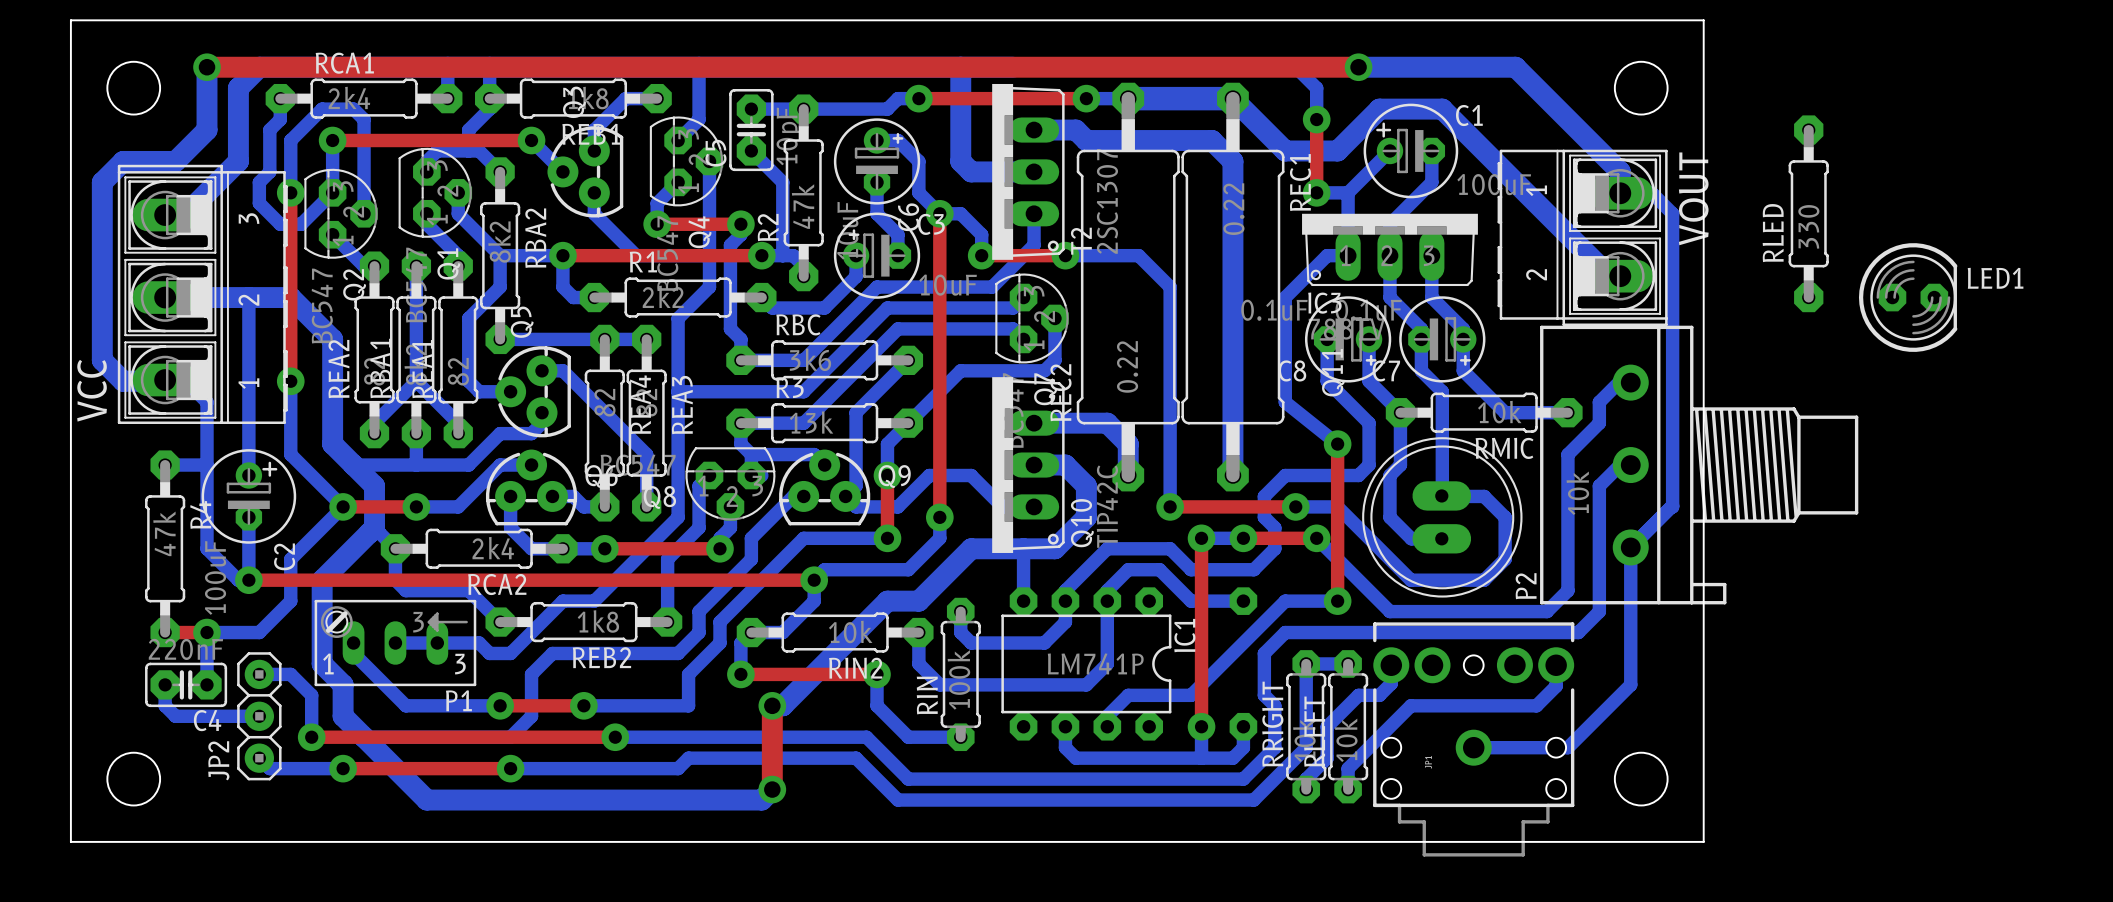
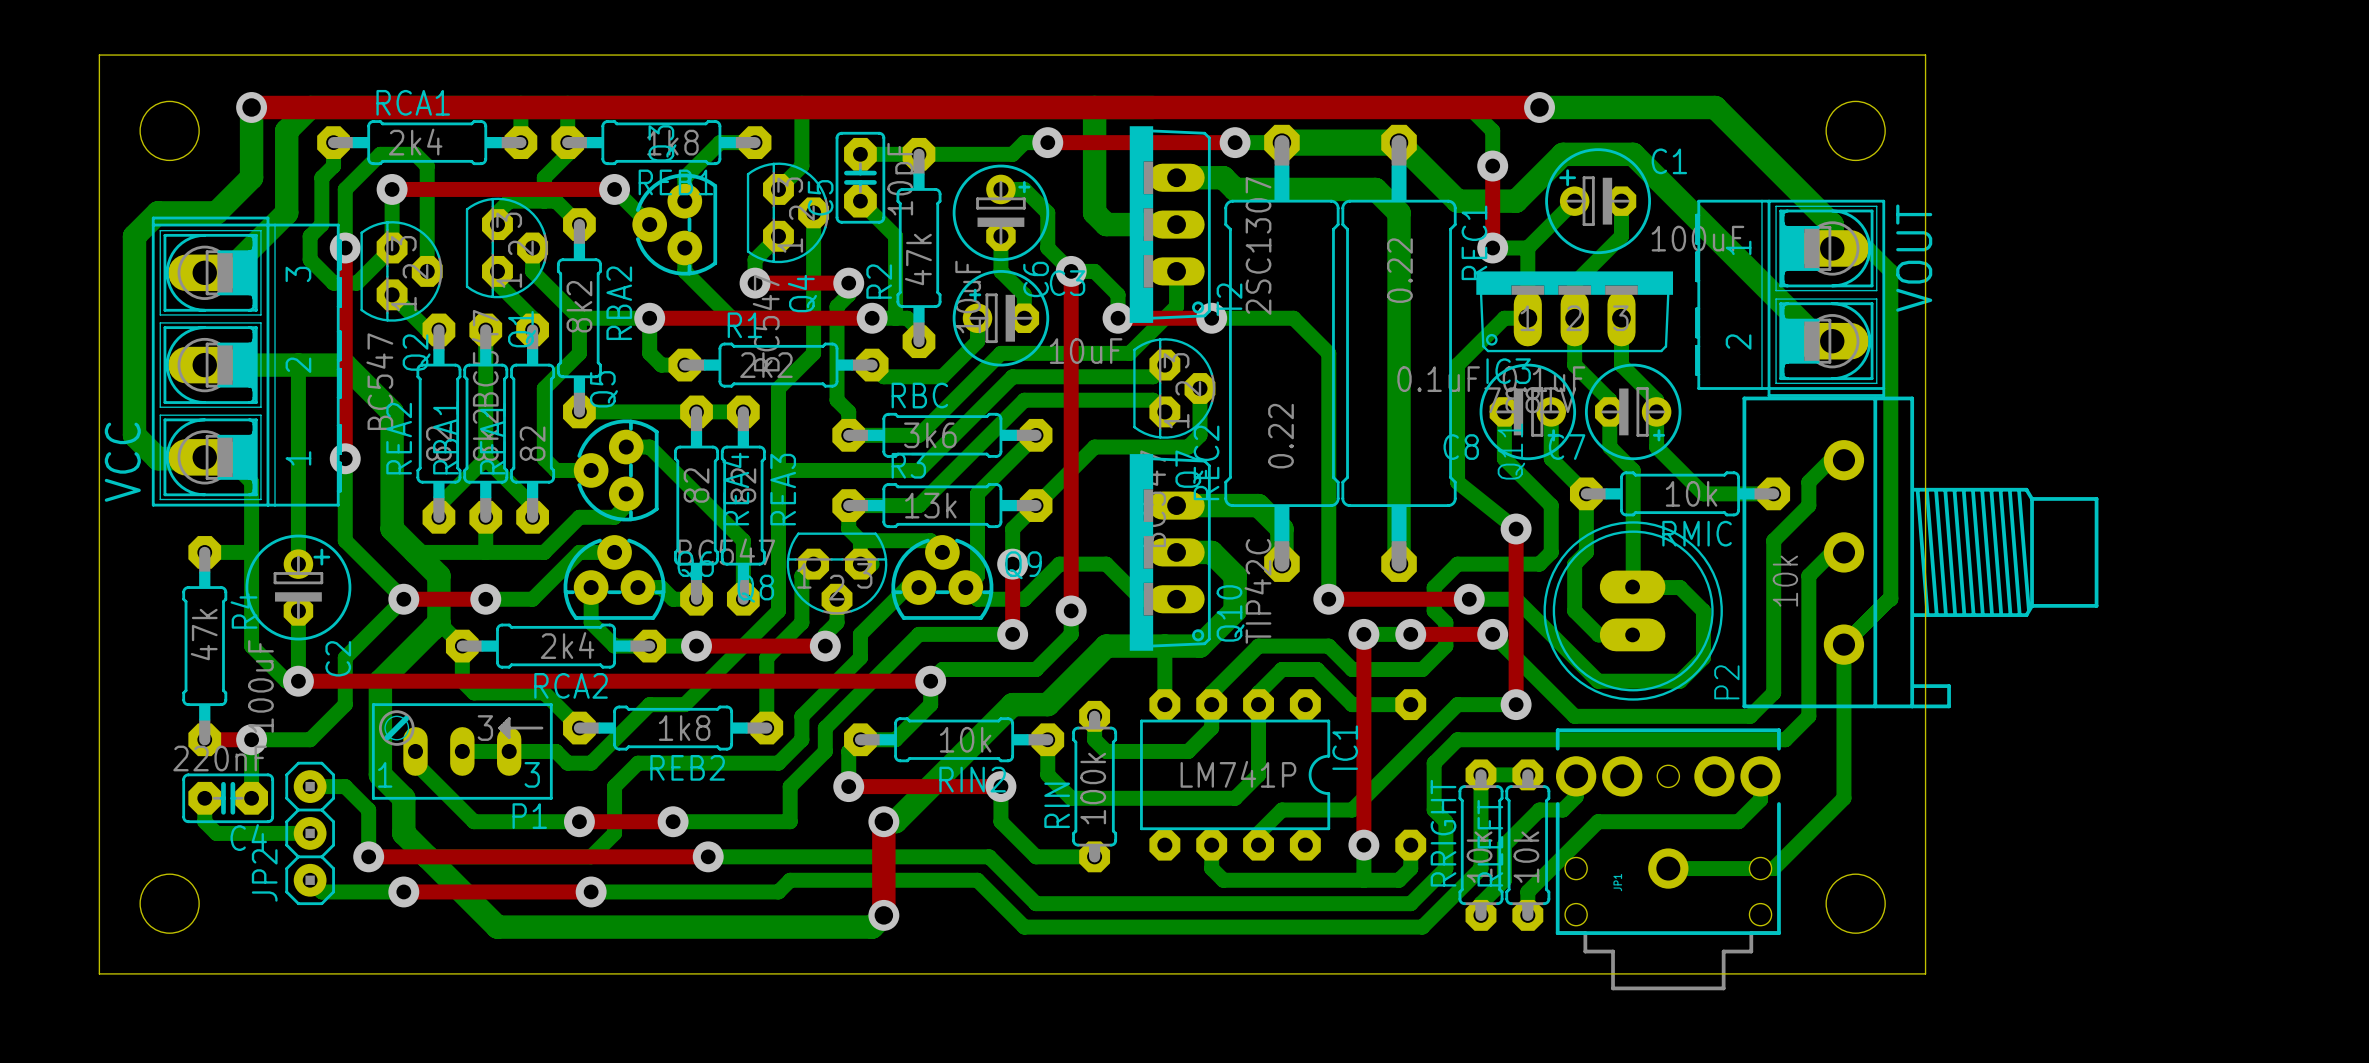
RLED: 330 (1808, 213) -> none
LED1: (1908, 297) -> none

